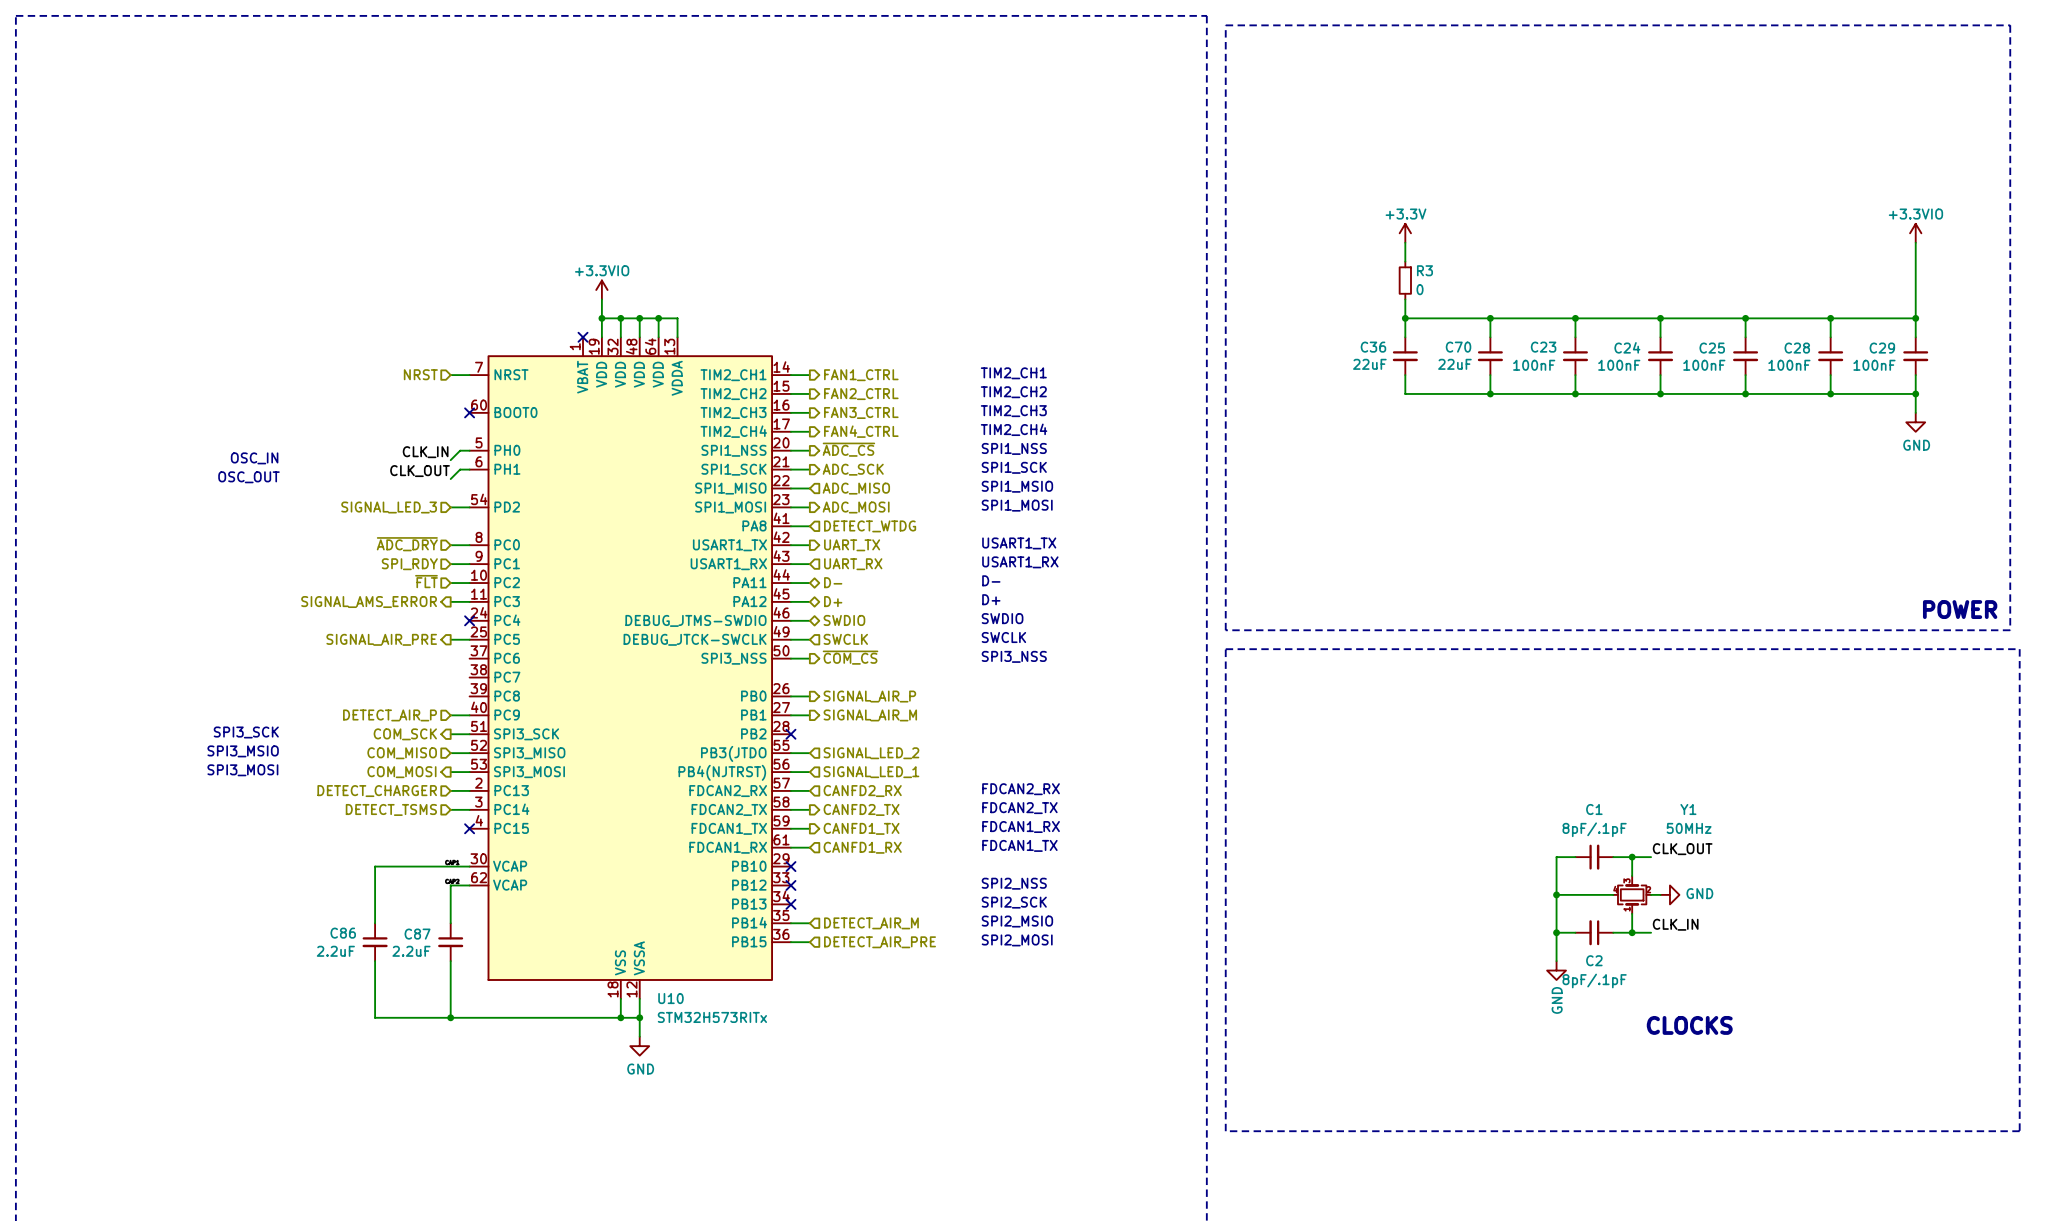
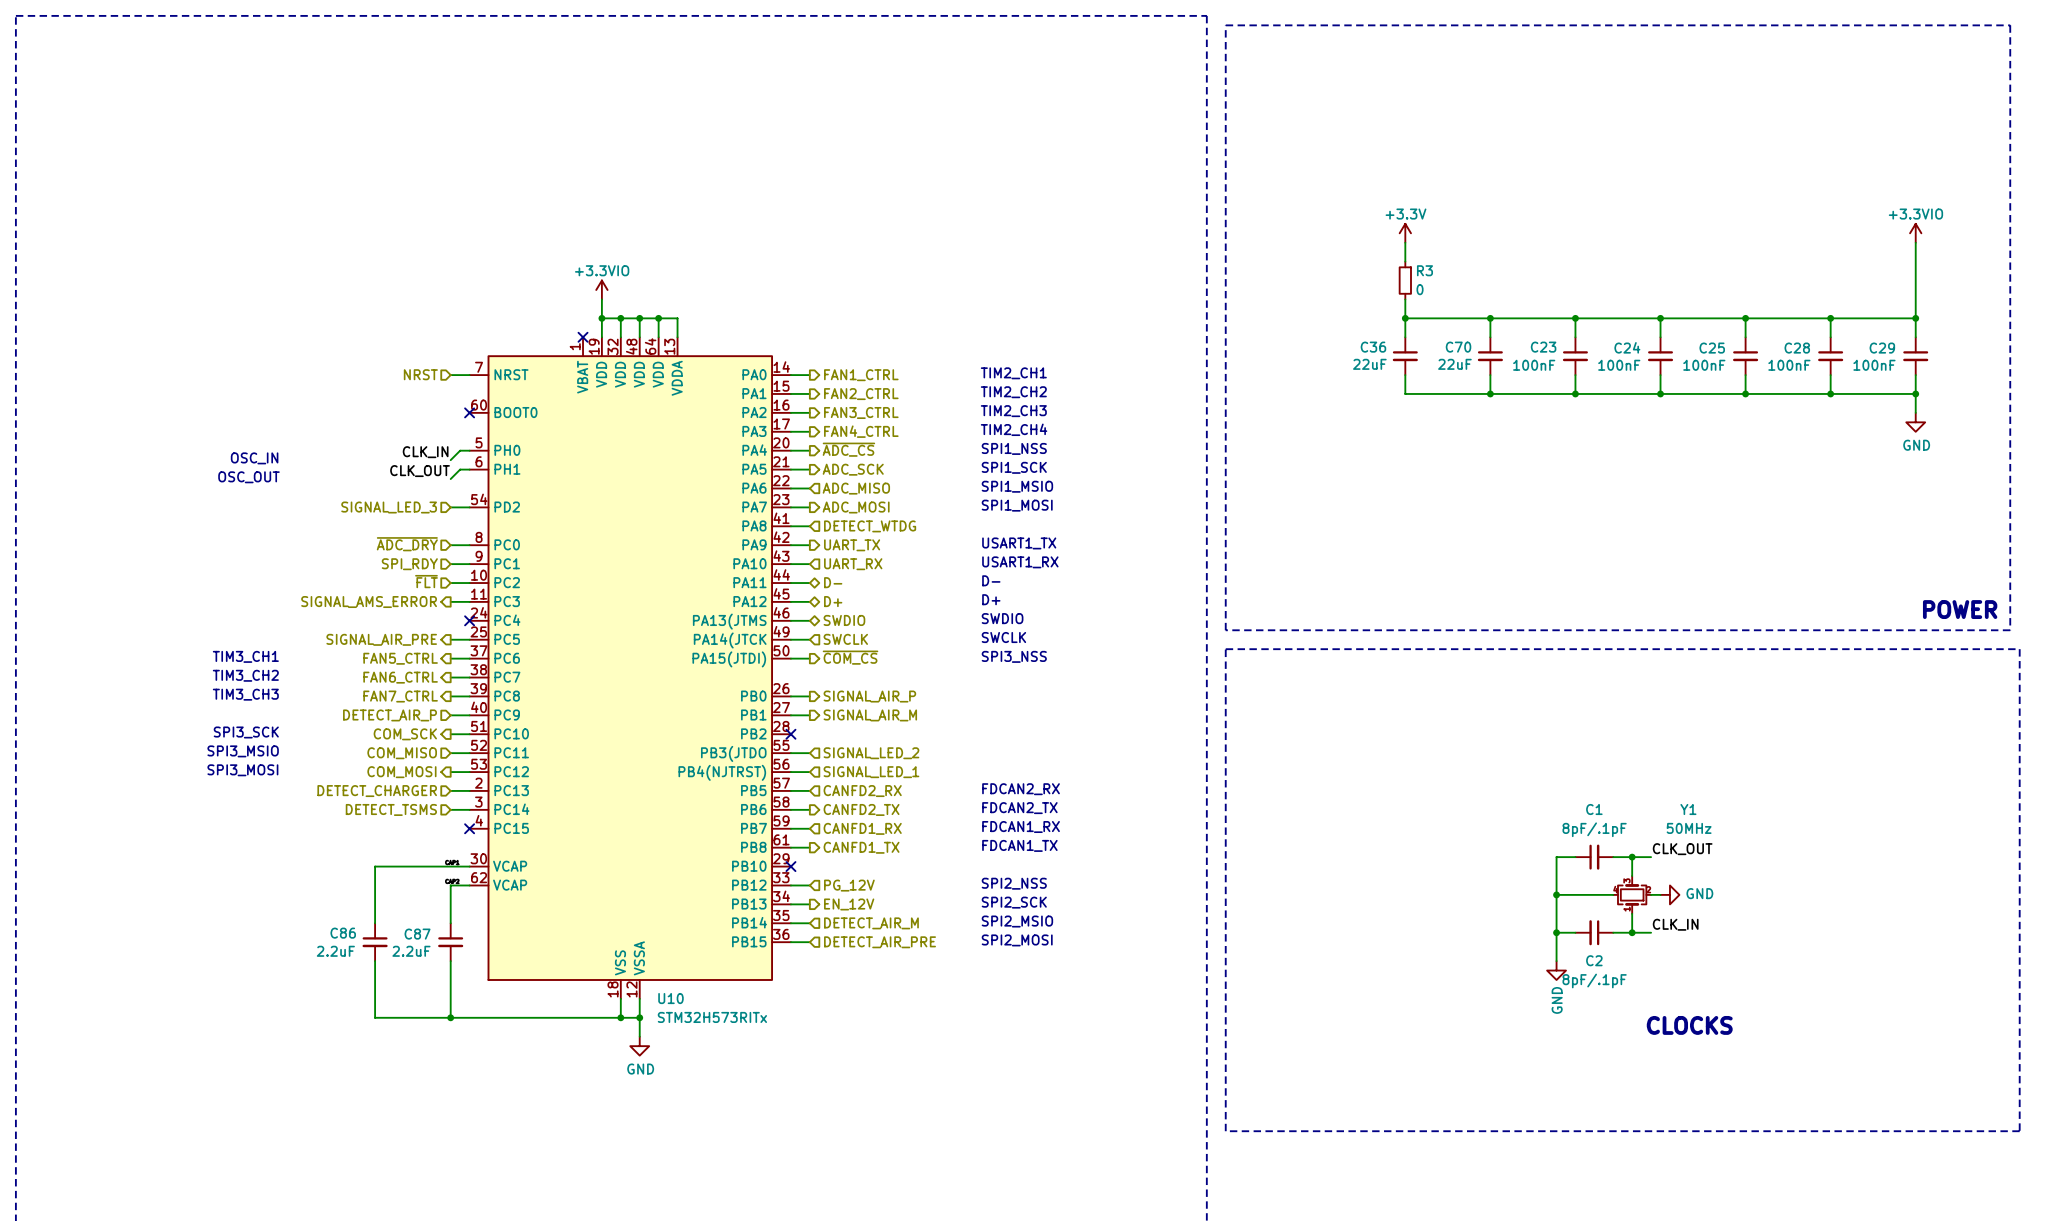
U10 symbol: [469, 337, 791, 999] -> [469, 337, 791, 999]
text: none -> TIM3_CH1 (245, 656)
hierarchical label: none -> FAN5_CTRL (400, 658)
wire: none -> (450, 658) (469, 658)
text: none -> TIM3_CH2 (245, 675)
hierarchical label: none -> FAN6_CTRL (400, 677)
wire: none -> (450, 677) (469, 677)
text: none -> TIM3_CH3 (245, 694)
hierarchical label: none -> FAN7_CTRL (400, 696)
wire: none -> (450, 696) (469, 696)
hierarchical label shape: output (861, 828) -> input (862, 828)
hierarchical label: CANFD1_TX (861, 828) -> CANFD1_RX (862, 828)
hierarchical label shape: input (862, 847) -> output (861, 847)
hierarchical label: CANFD1_RX (862, 847) -> CANFD1_TX (861, 847)
wire: none -> (790, 885) (809, 885)
no-connect mark: (790, 885) -> none
hierarchical label: none -> PG_12V (849, 885)
wire: none -> (790, 904) (809, 904)
no-connect mark: (790, 904) -> none
hierarchical label: none -> EN_12V (849, 904)

